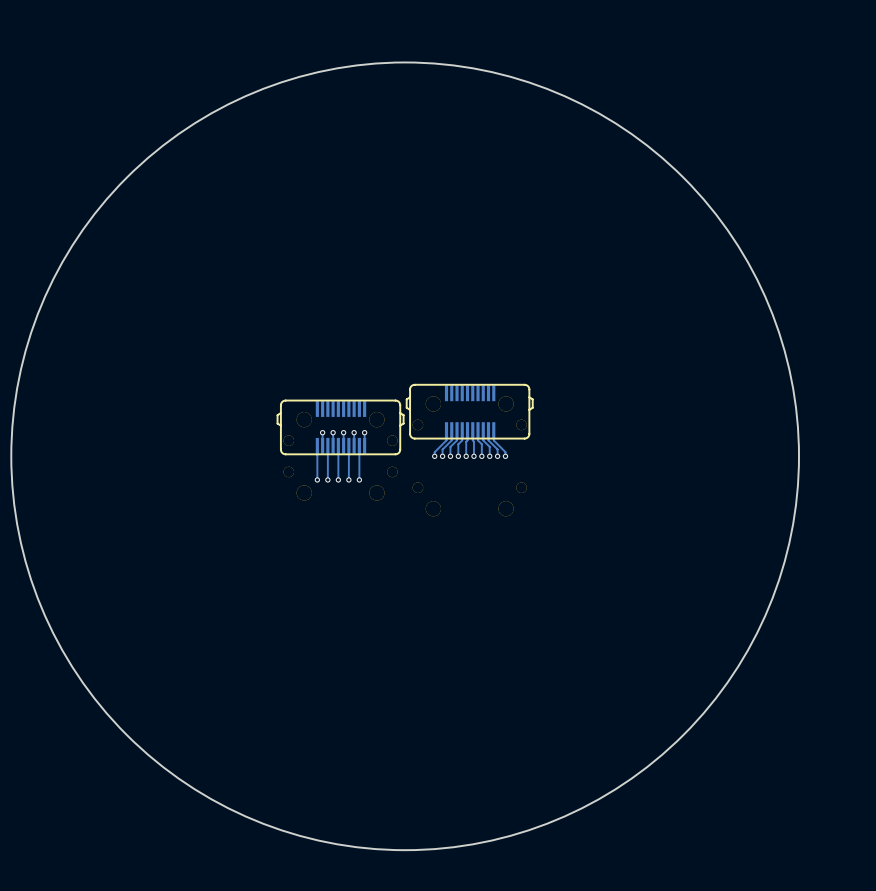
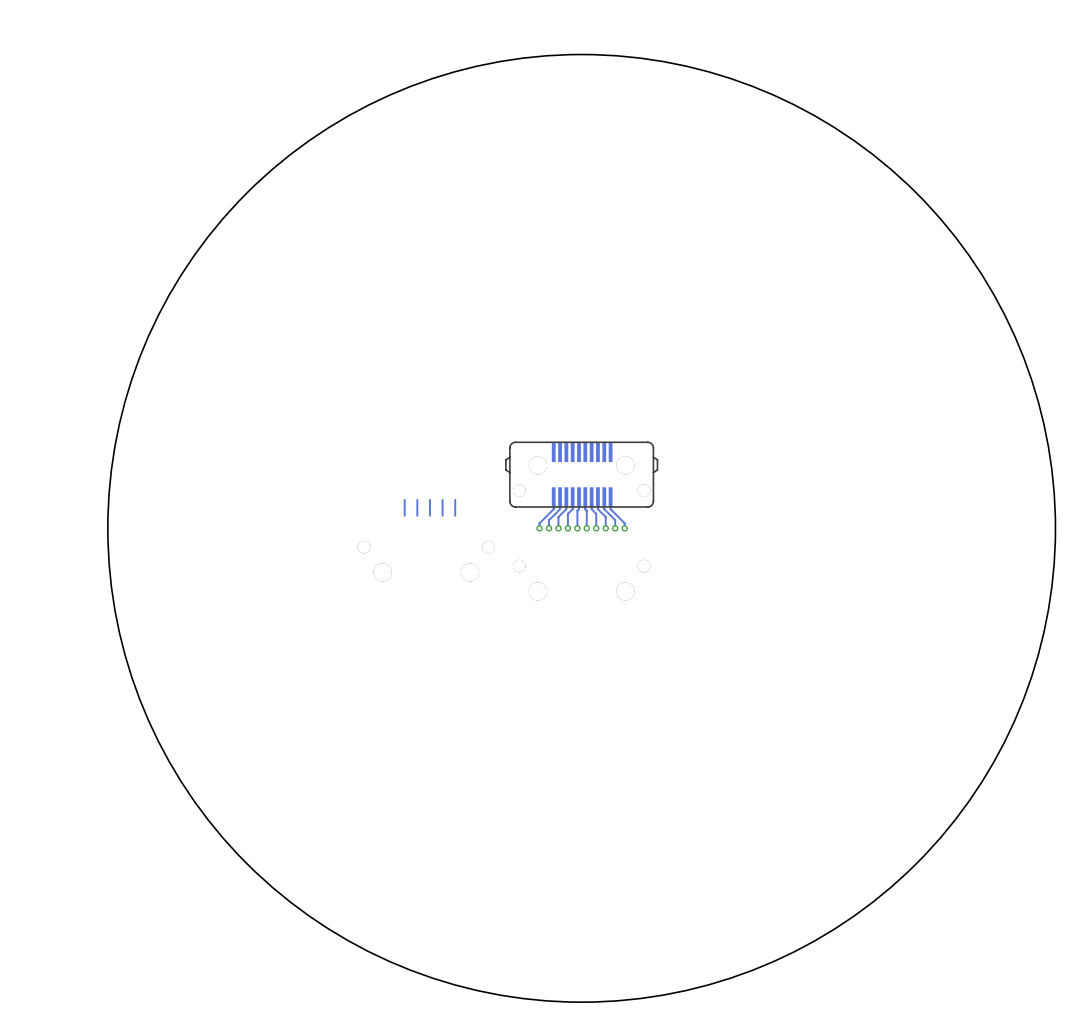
part: (340, 427) -> none
via: (322, 432) -> none
via: (333, 432) -> none
via: (343, 432) -> none
via: (354, 432) -> none
via: (364, 432) -> none
track: (317, 445) (317, 479) -> none
track: (327, 445) (327, 479) -> none
track: (338, 445) (338, 479) -> none
track: (348, 445) (348, 479) -> none
track: (359, 445) (359, 479) -> none
round board edge position: (405, 456) -> (581, 528)
via: (317, 479) -> none
via: (327, 479) -> none
via: (338, 479) -> none
via: (348, 479) -> none
via: (359, 479) -> none

